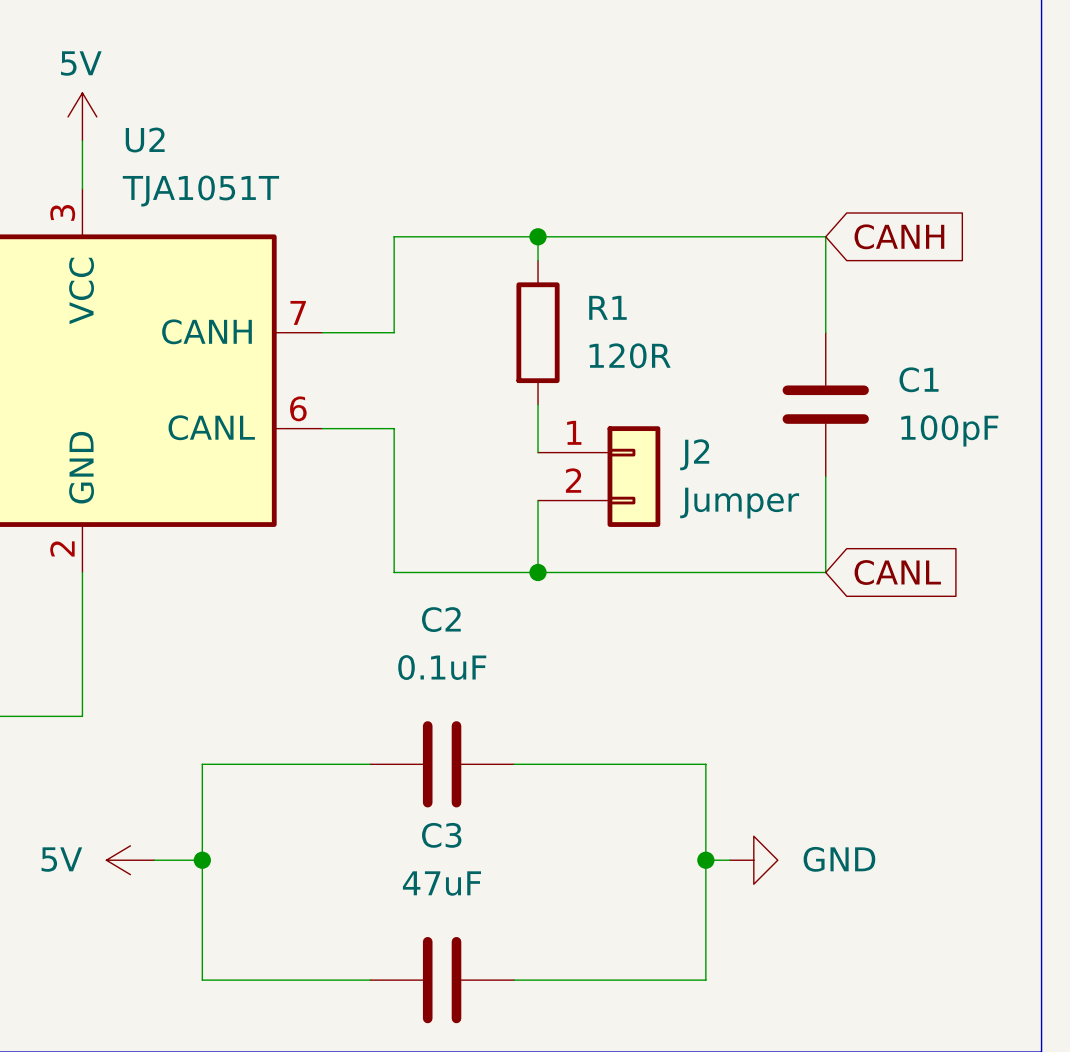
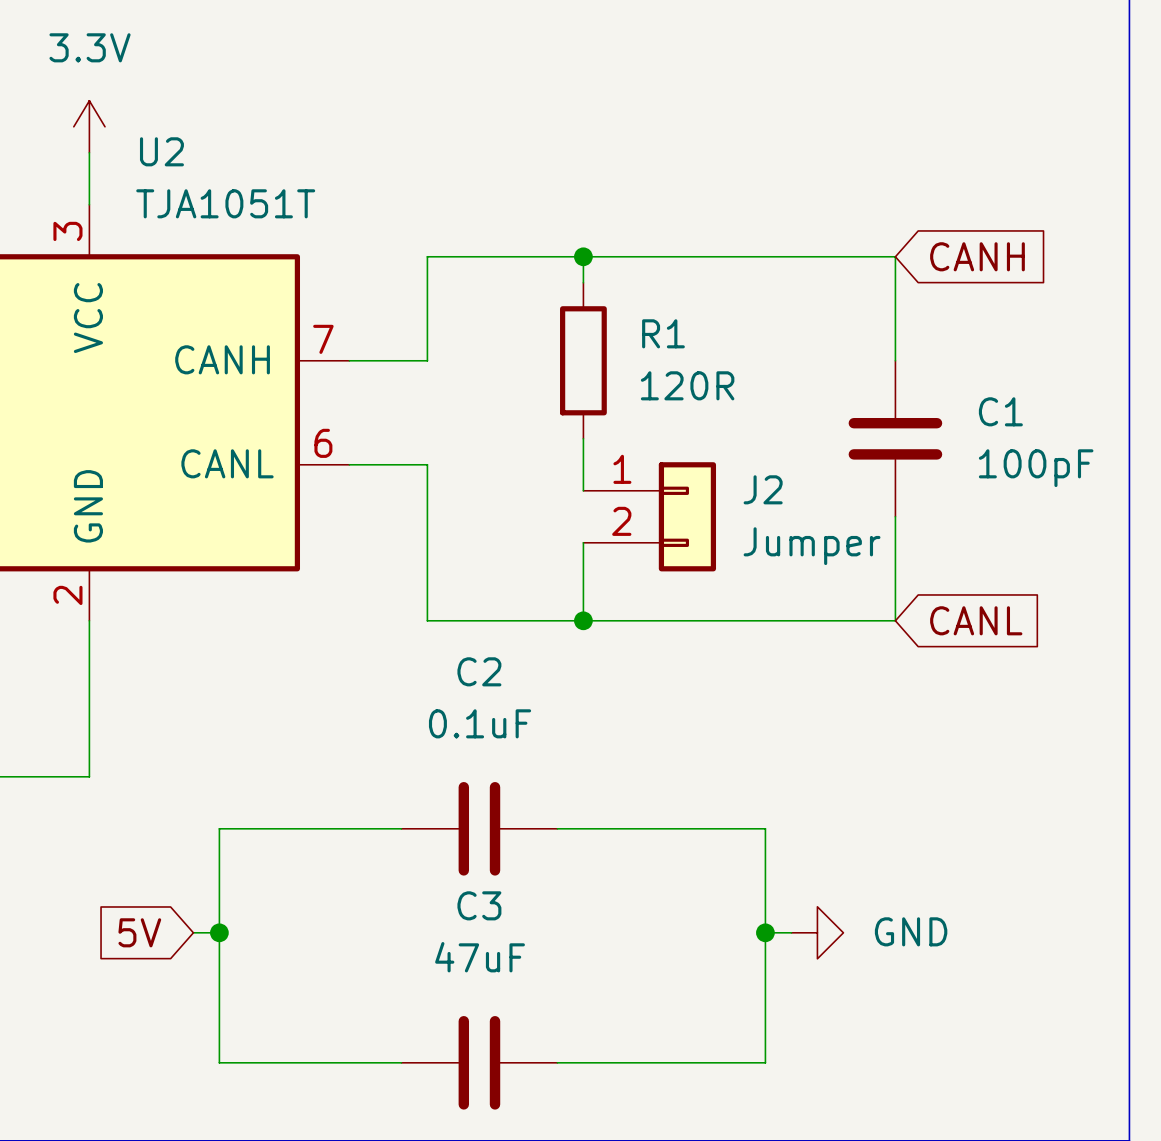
power symbol: 5V (82, 116) -> 3.3V (89, 126)
power symbol: 5V (130, 860) -> none
global label: none -> 5V (139, 932)
wire: (154, 860) (178, 860) -> none

